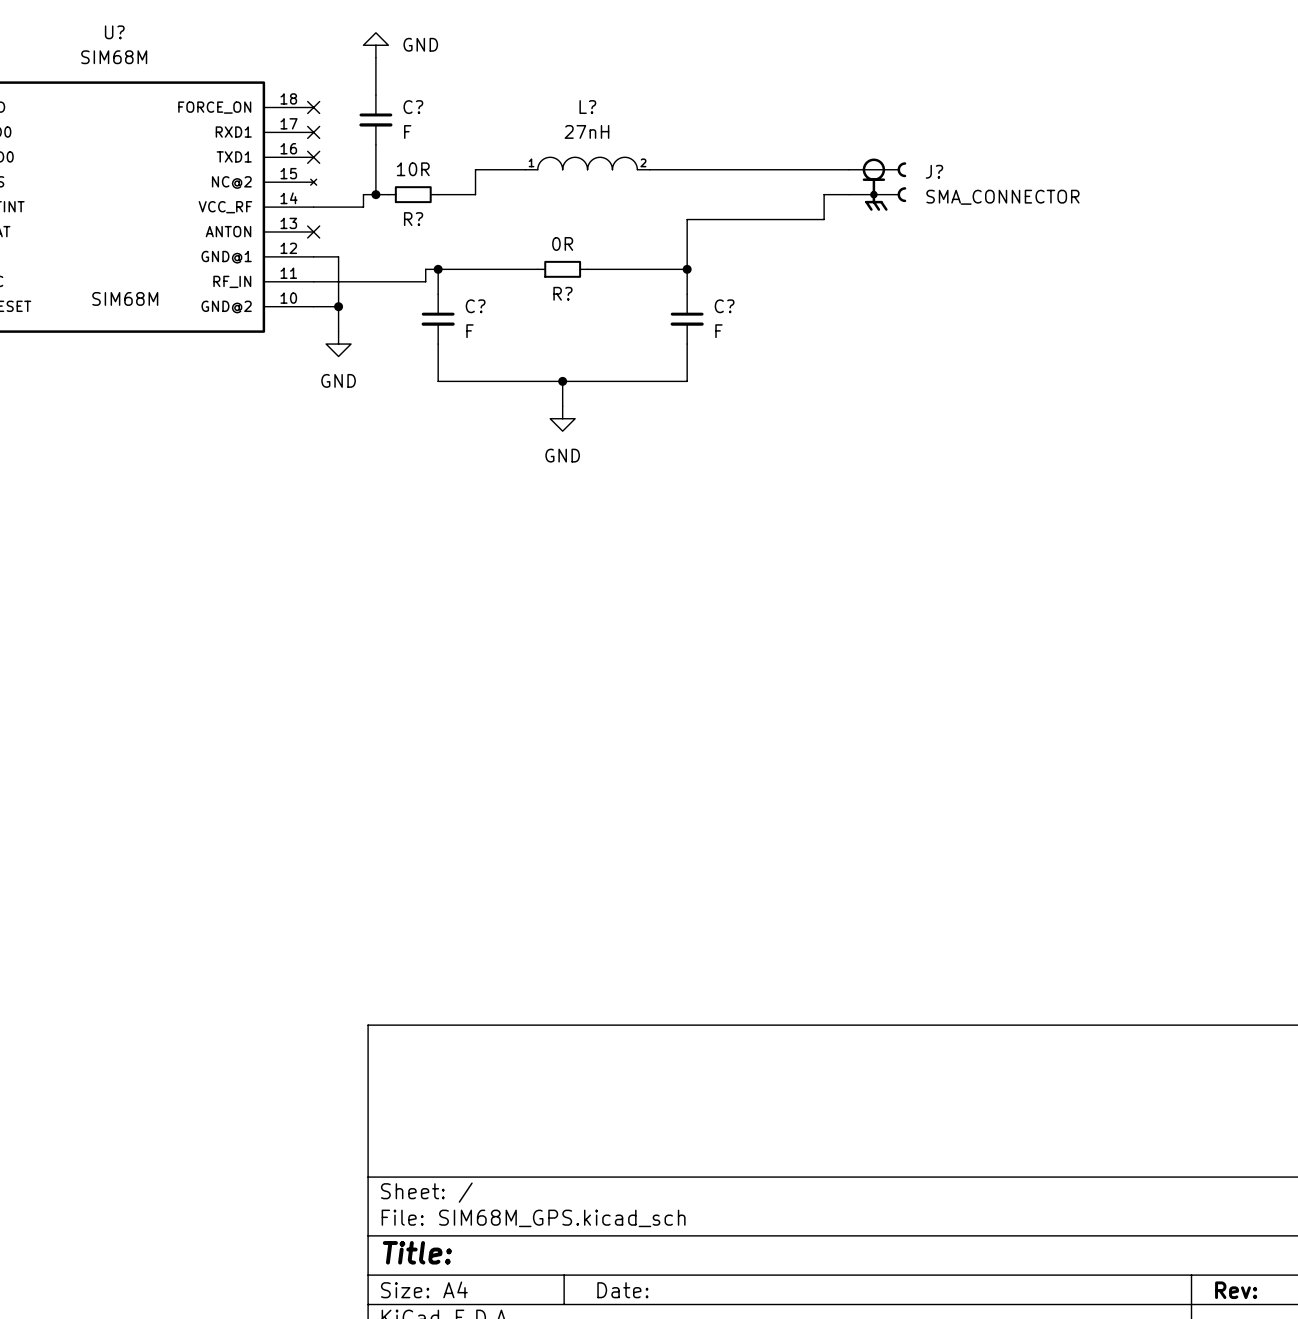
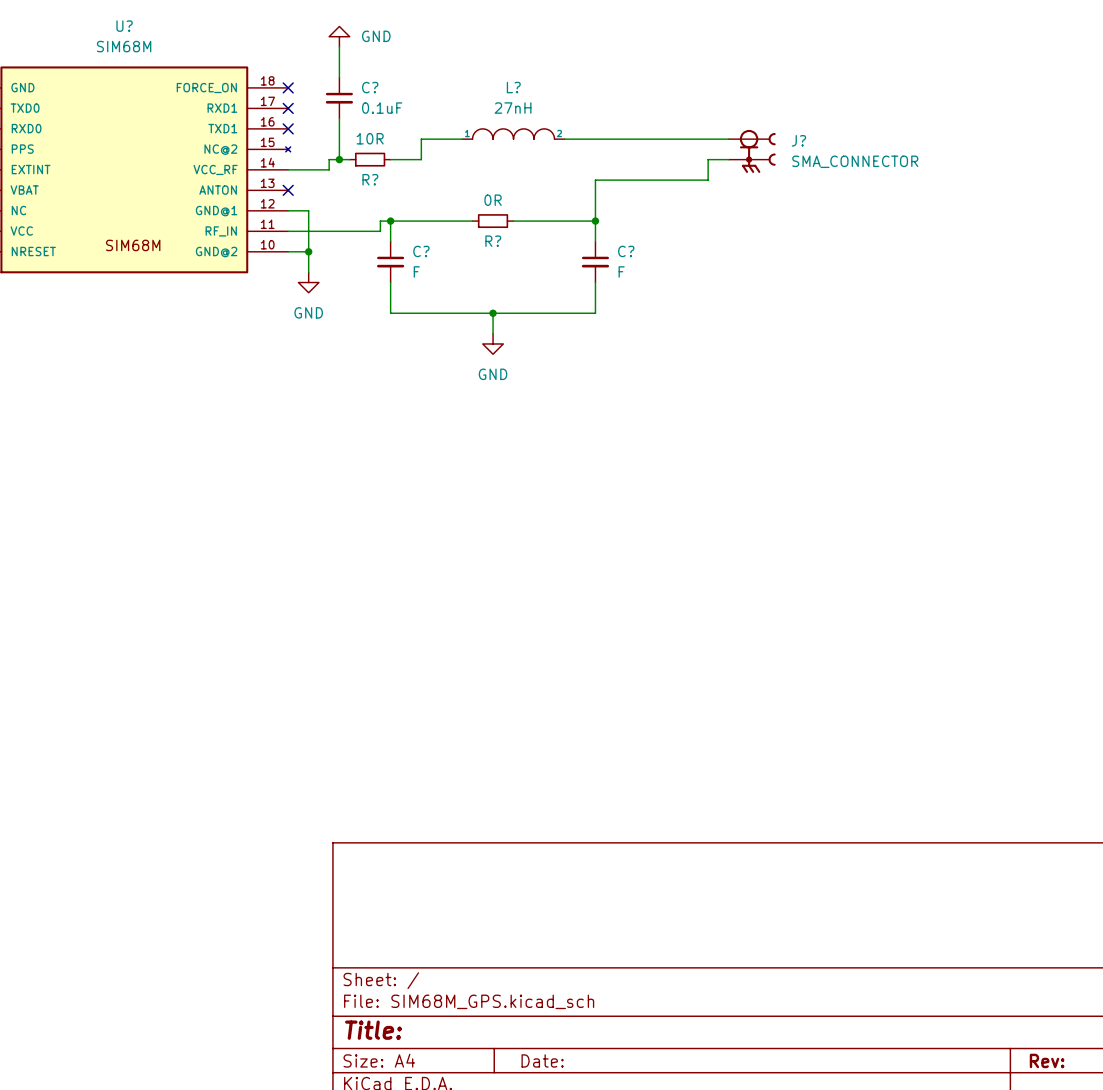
C? value: F (407, 131) -> 0.1uF (382, 108)

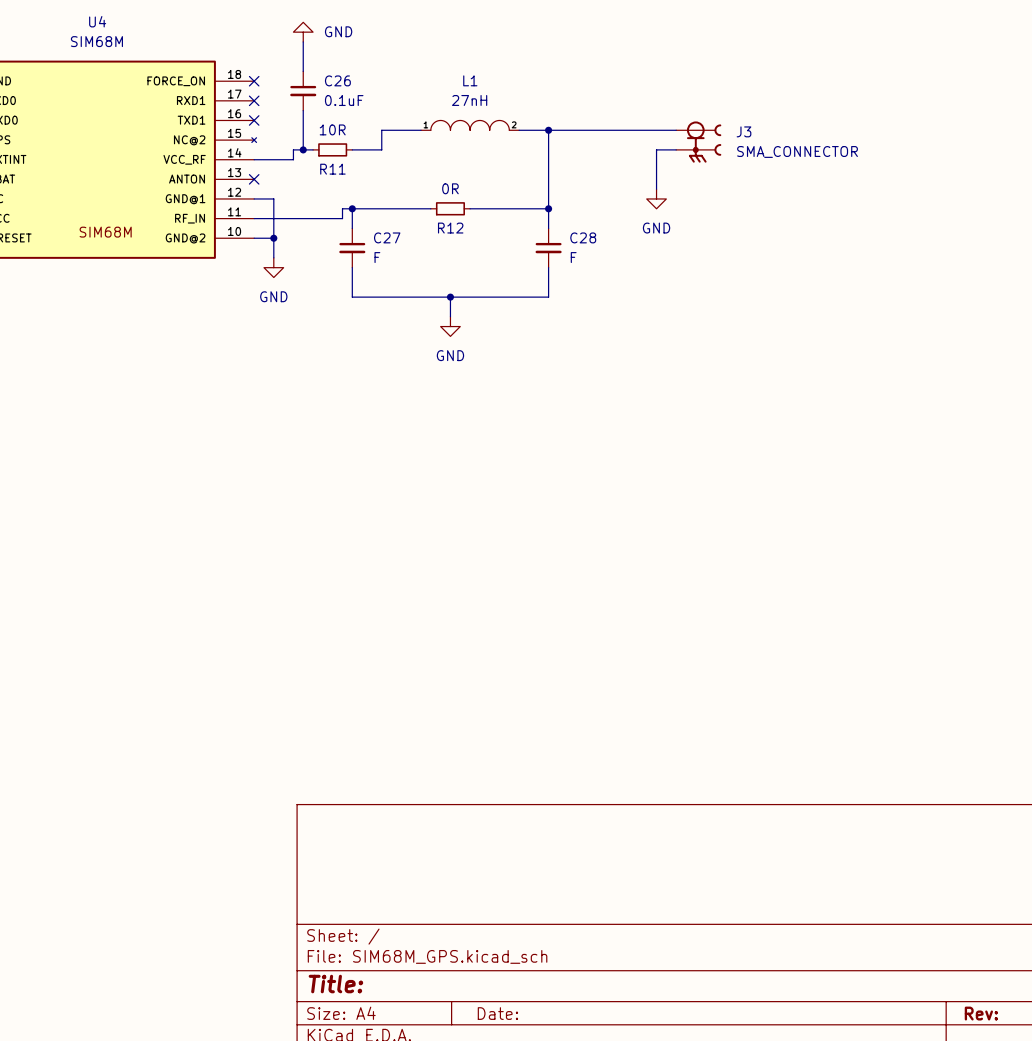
U? name: U? (124, 26) -> U4 (97, 21)
C? name: C? (370, 87) -> C26 (337, 80)
L? name: L? (513, 87) -> L1 (470, 80)
wire: none -> (548, 130) (548, 169)
junction: none -> (548, 130)
J? name: J? (798, 140) -> J3 (744, 131)
R? name: R? (370, 179) -> R11 (332, 169)
wire: (595, 180) (708, 180) -> (656, 189) (656, 169)
power symbol: none -> GND (656, 198)
R? name: R? (493, 241) -> R12 (450, 228)
C? name: C? (421, 251) -> C27 (387, 237)
C? name: C? (626, 251) -> C28 (583, 237)

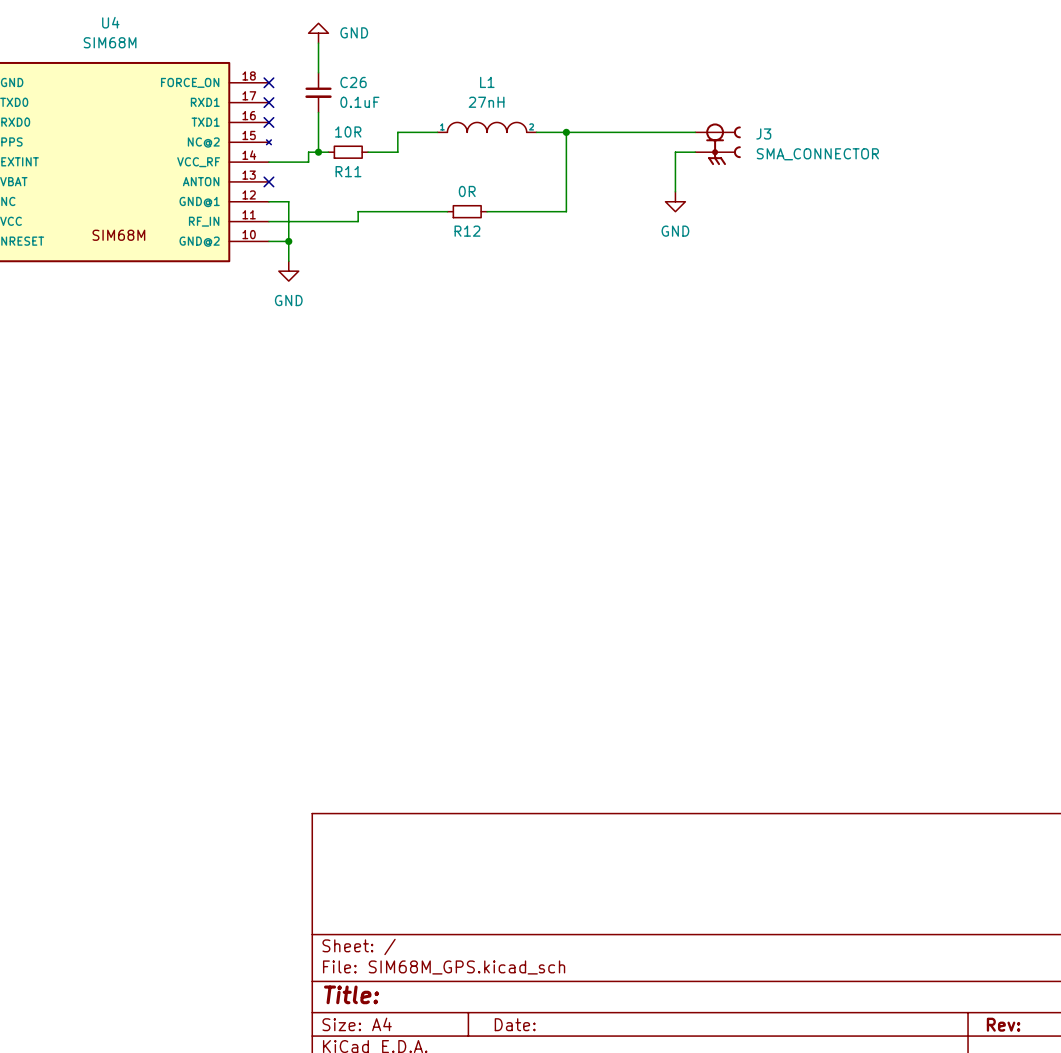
wire: (352, 208) (352, 228) -> none
junction: (352, 208) -> none
wire: (548, 208) (548, 228) -> none
junction: (548, 208) -> none
C27: F (352, 248) -> none
C28: F (548, 248) -> none
wire: (352, 267) (352, 297) (548, 297) (548, 267) -> none
wire: (450, 297) (450, 316) -> none
junction: (450, 297) -> none
power symbol: GND (450, 326) -> none

